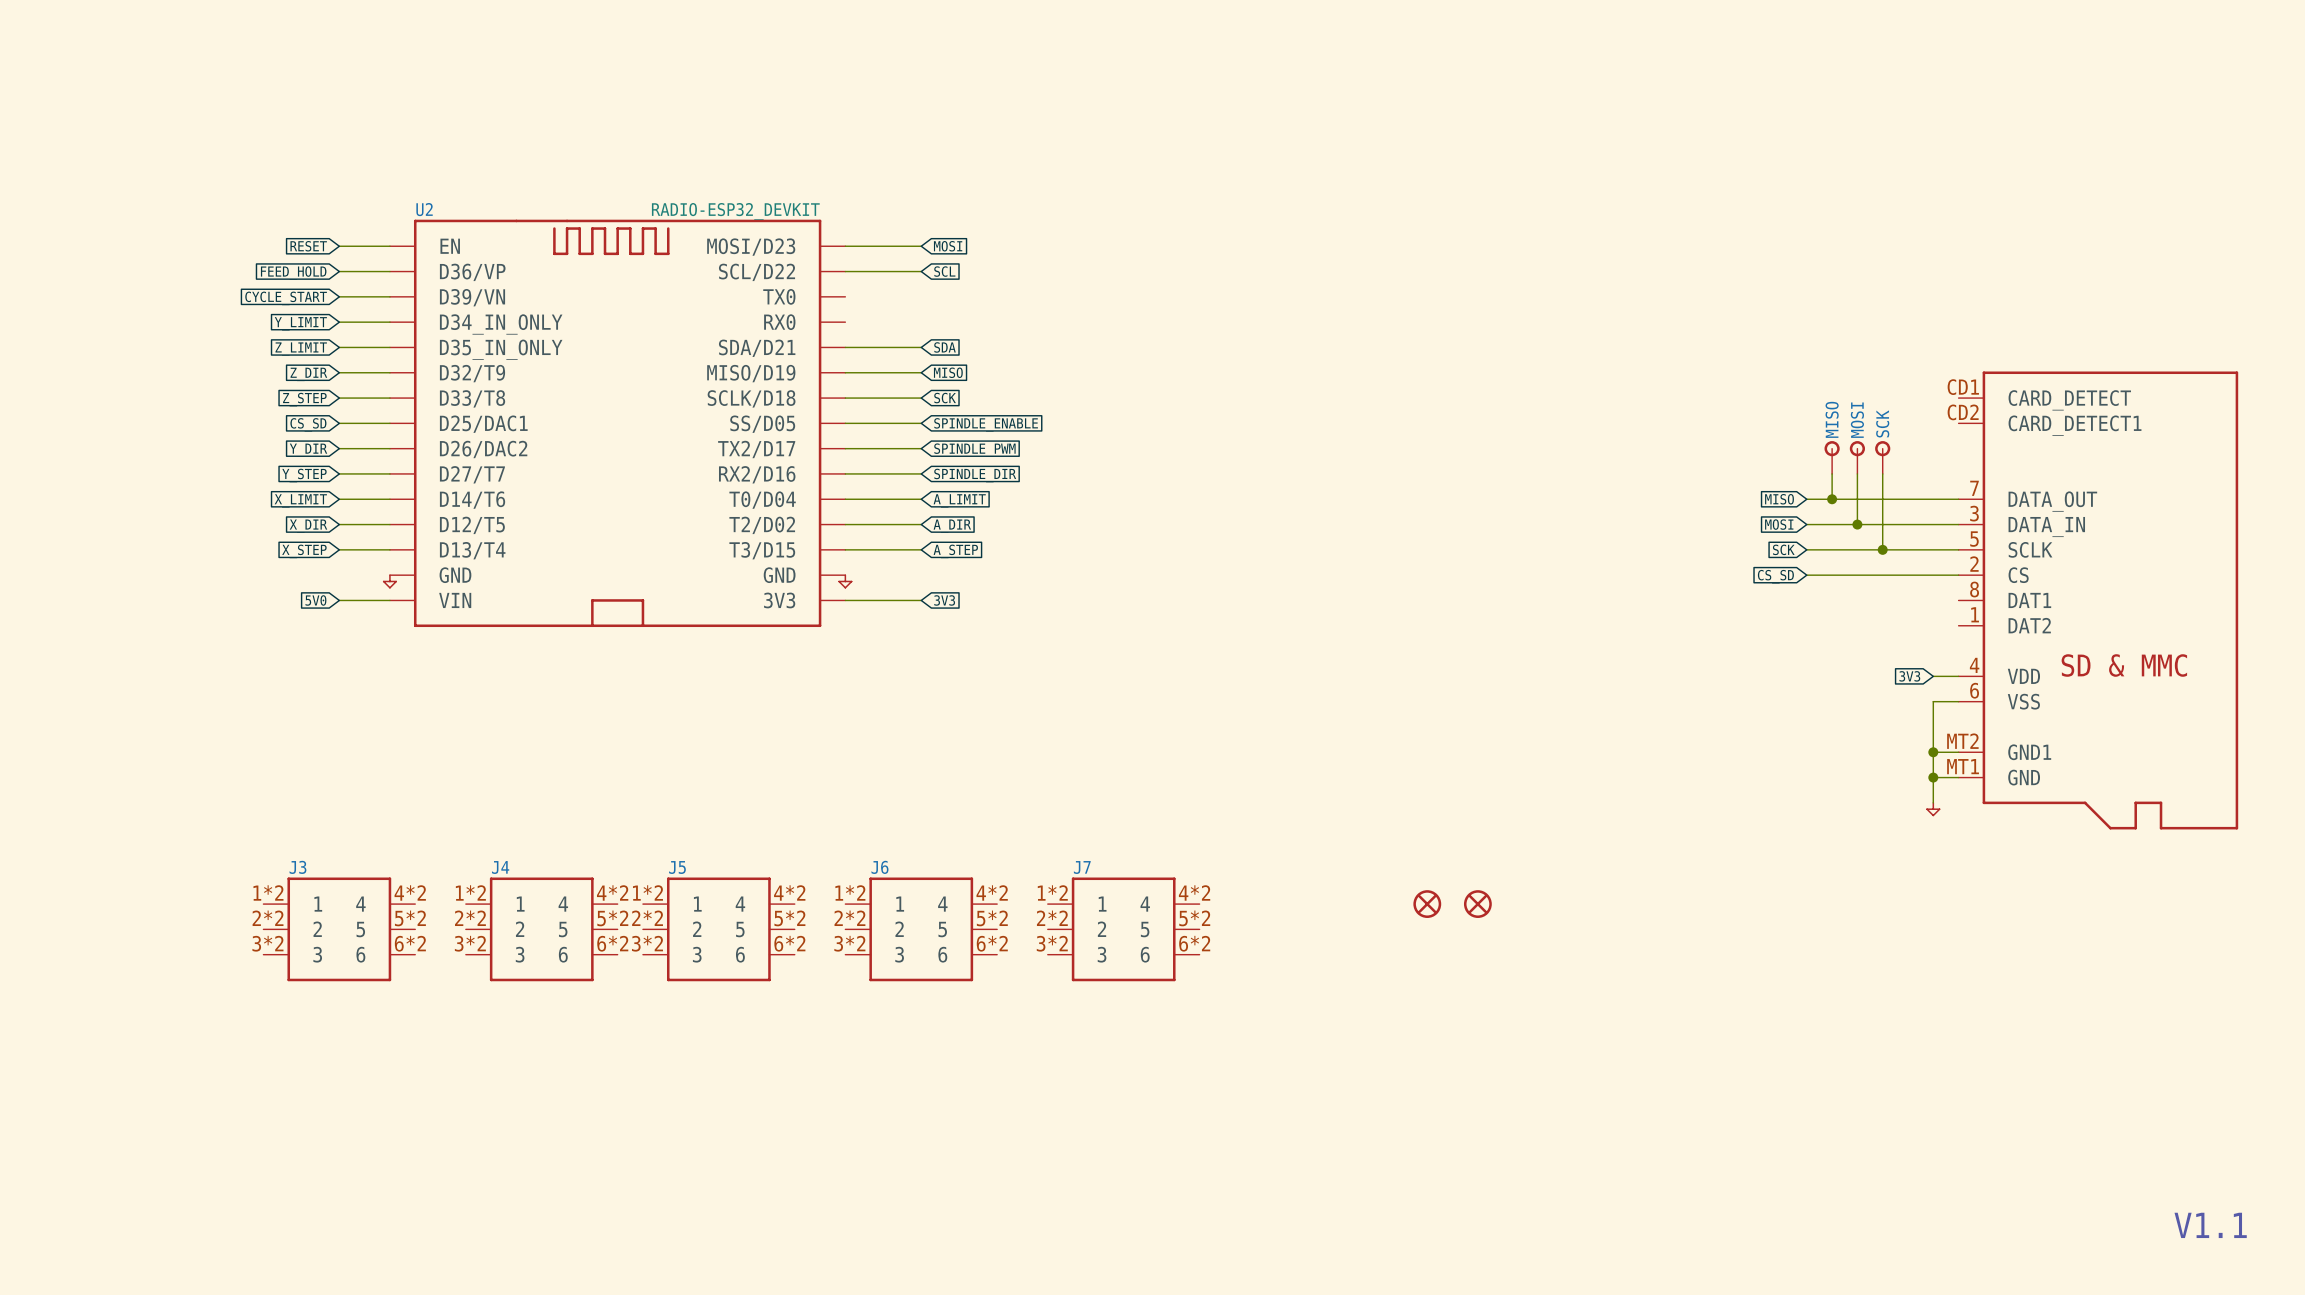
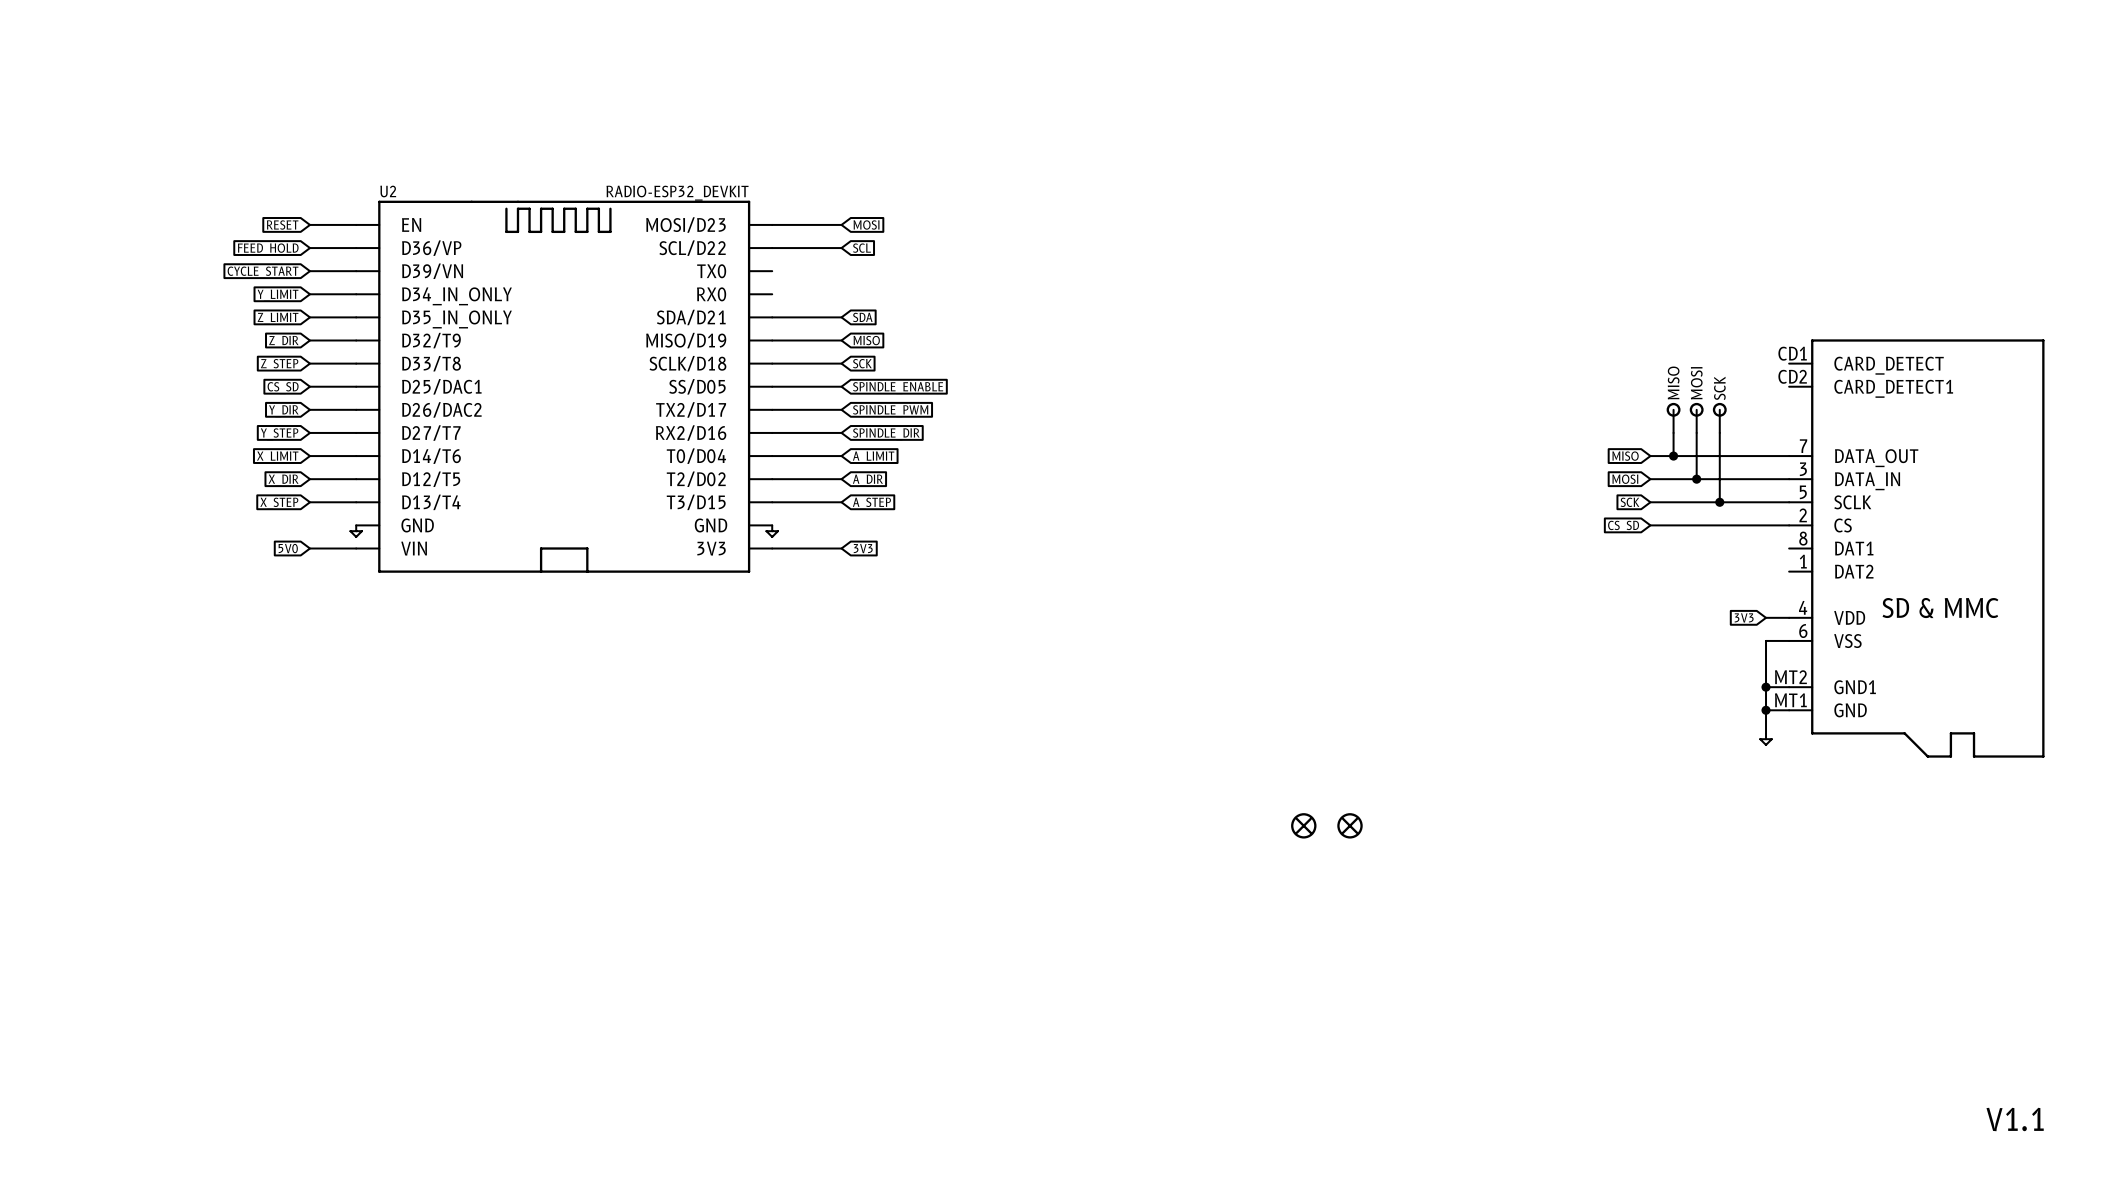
J3: (339, 929) -> none
J4: (541, 929) -> none
J5: (718, 929) -> none
J6: (921, 929) -> none
J7: (1123, 929) -> none

